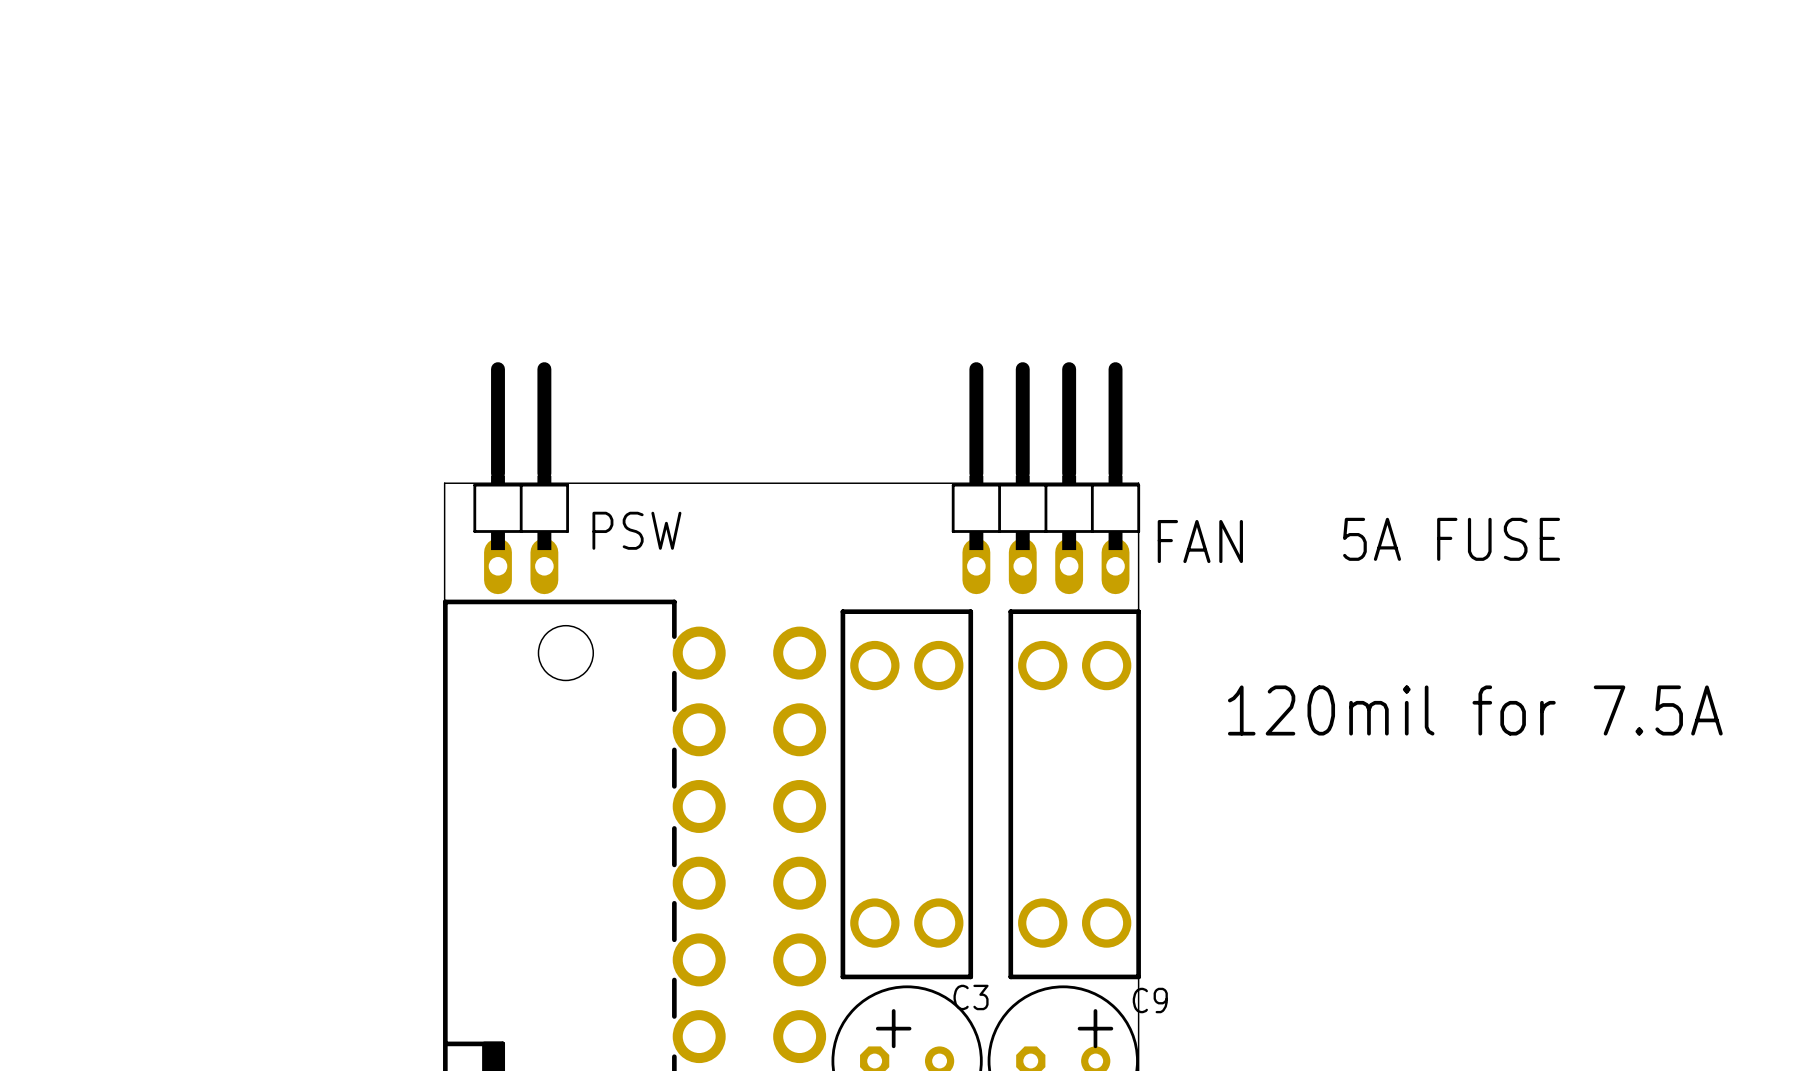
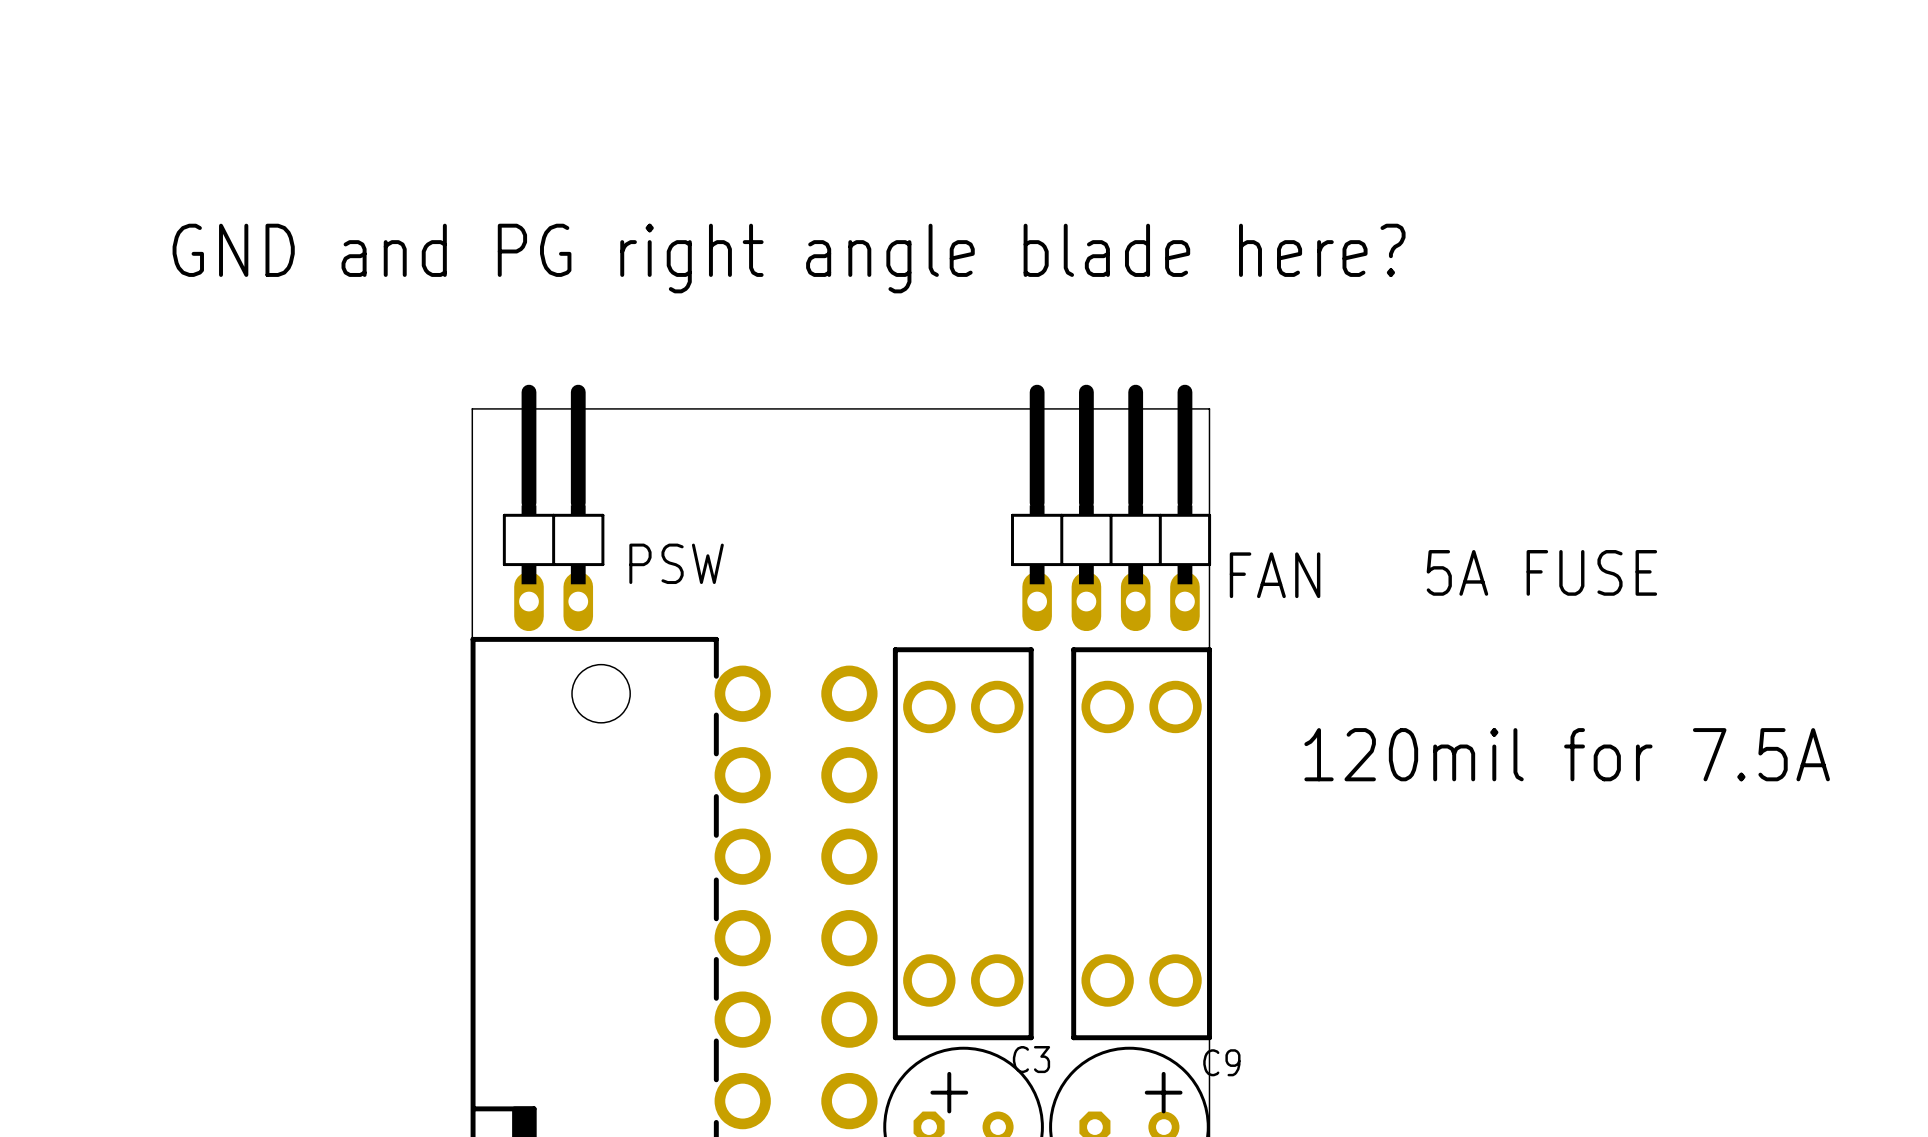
text: none -> GND and PG right angle blade here? (789, 258)
board edge: (444, 483) (1138, 483) -> (472, 513) (472, 408) (1209, 408) (1209, 513)

